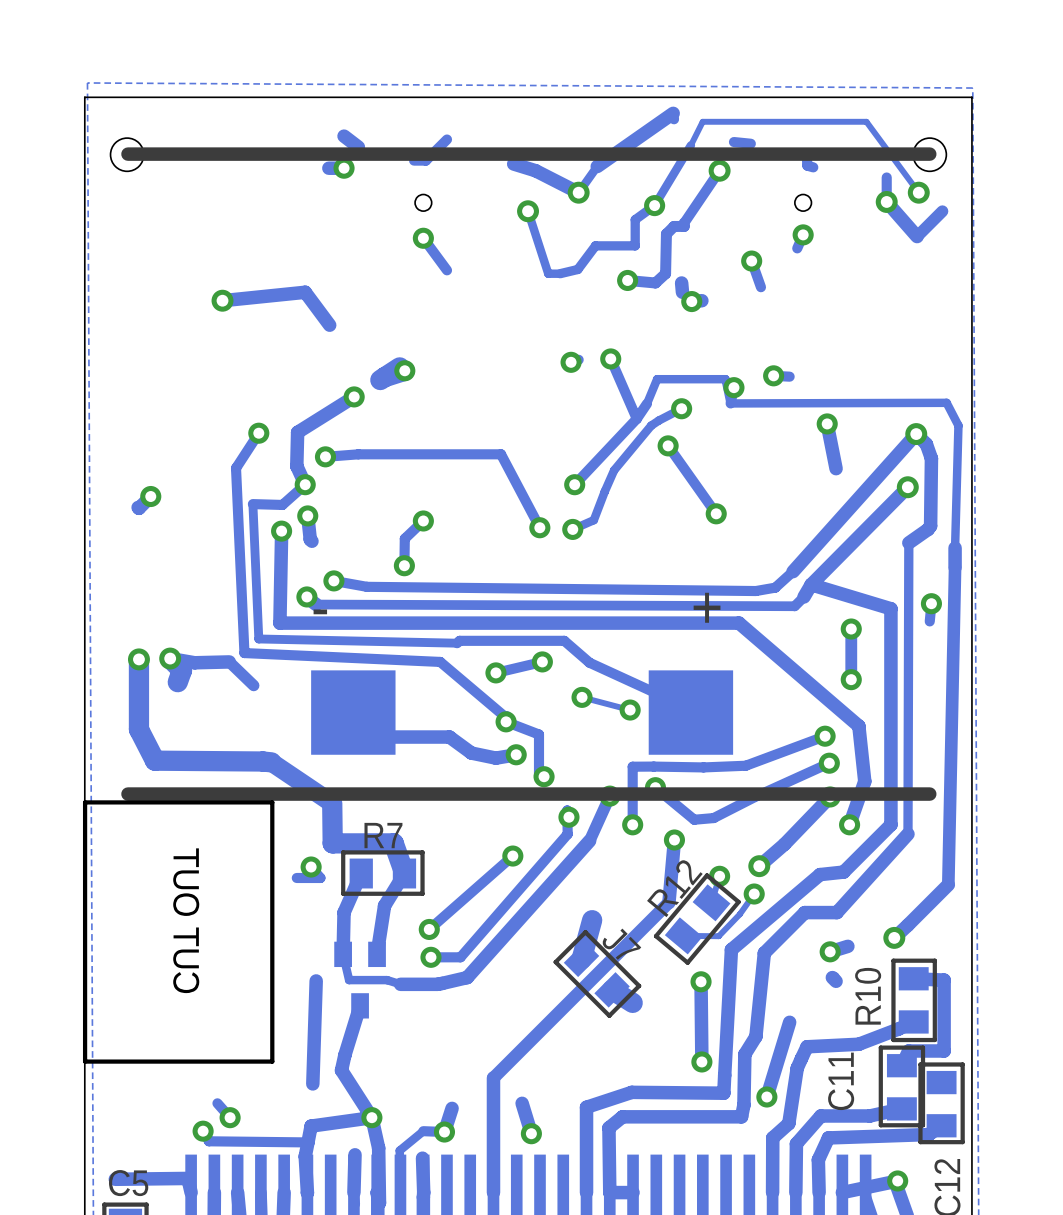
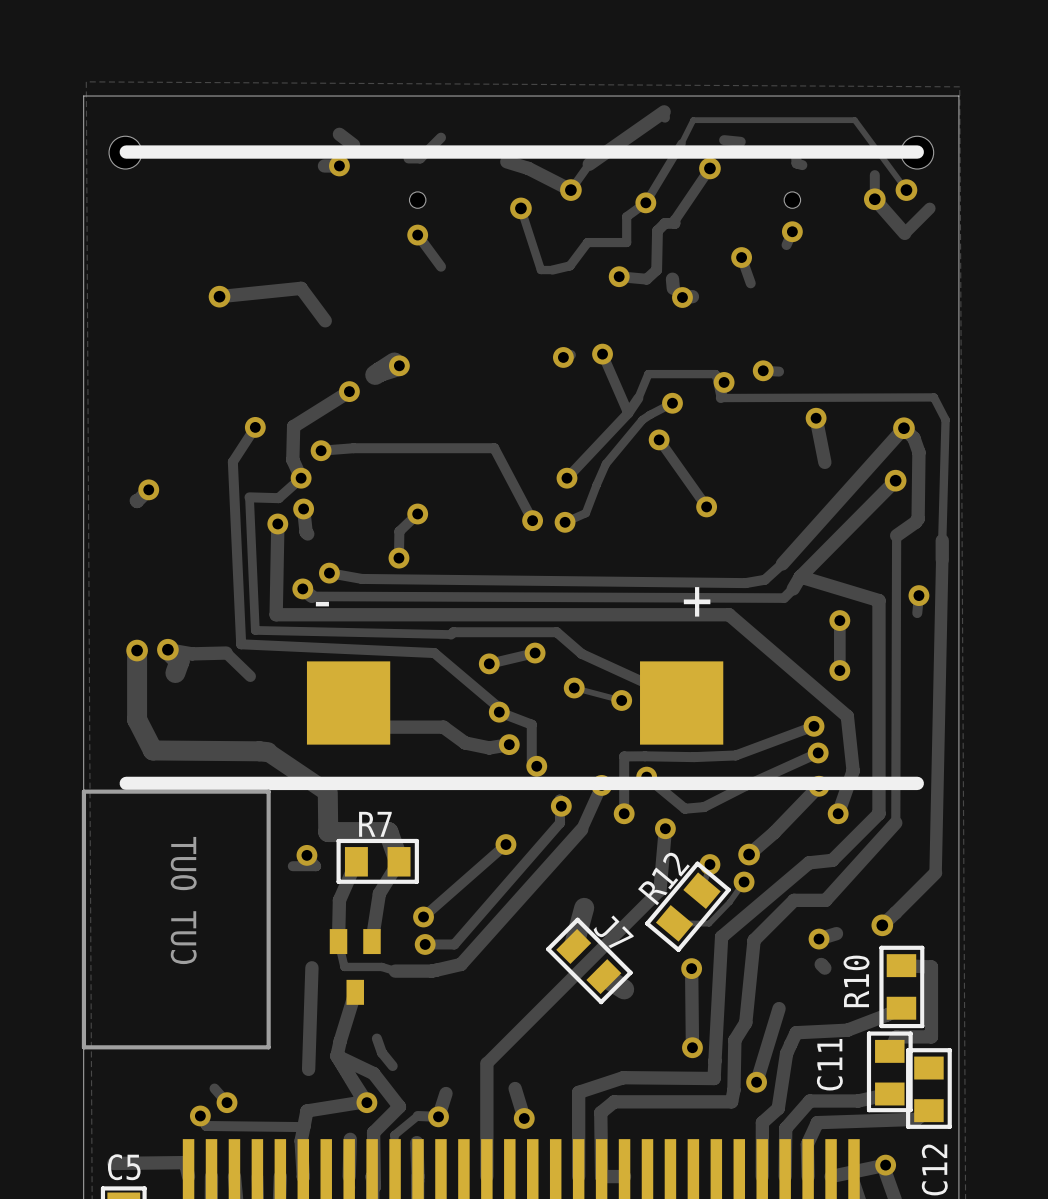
track: none -> (376, 1038) (381, 1052) (392, 1066)
track: (311, 1126) (371, 1117) (378, 1148) -> (306, 1110) (364, 1101) (336, 1056) (373, 1073) (399, 1106) (373, 1132)

